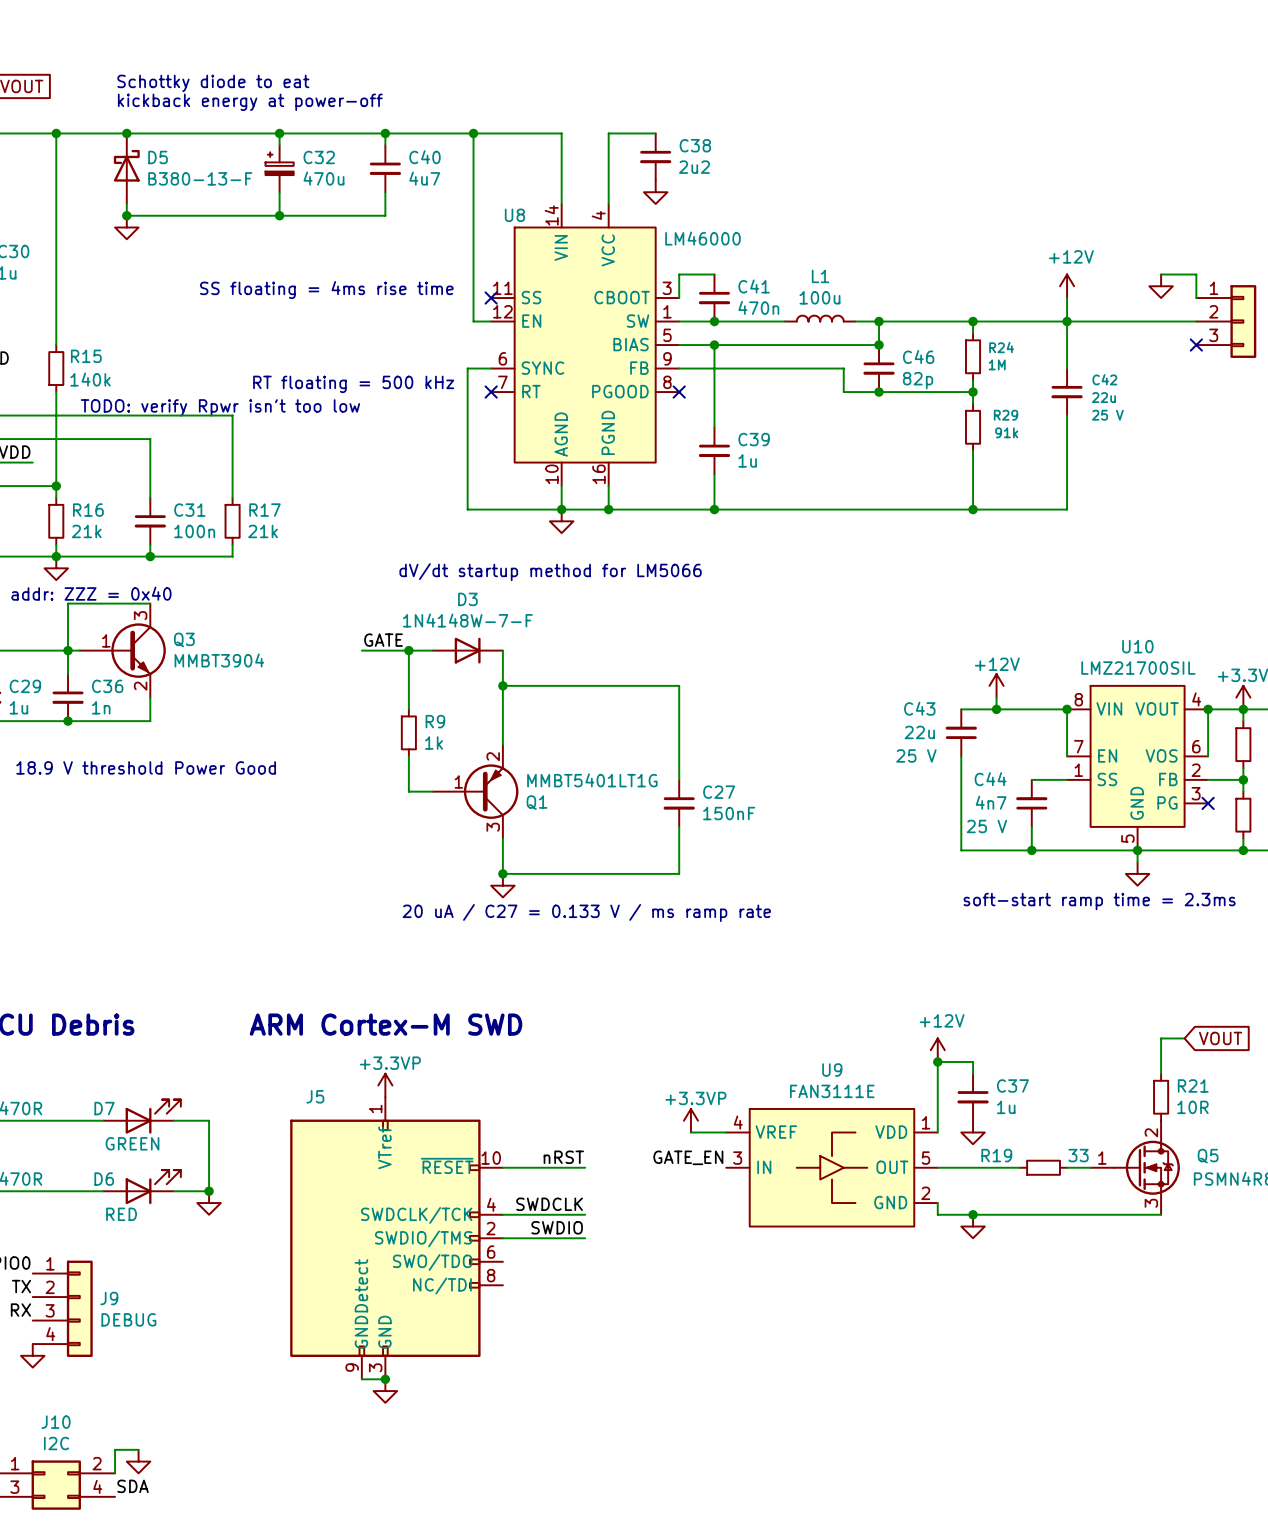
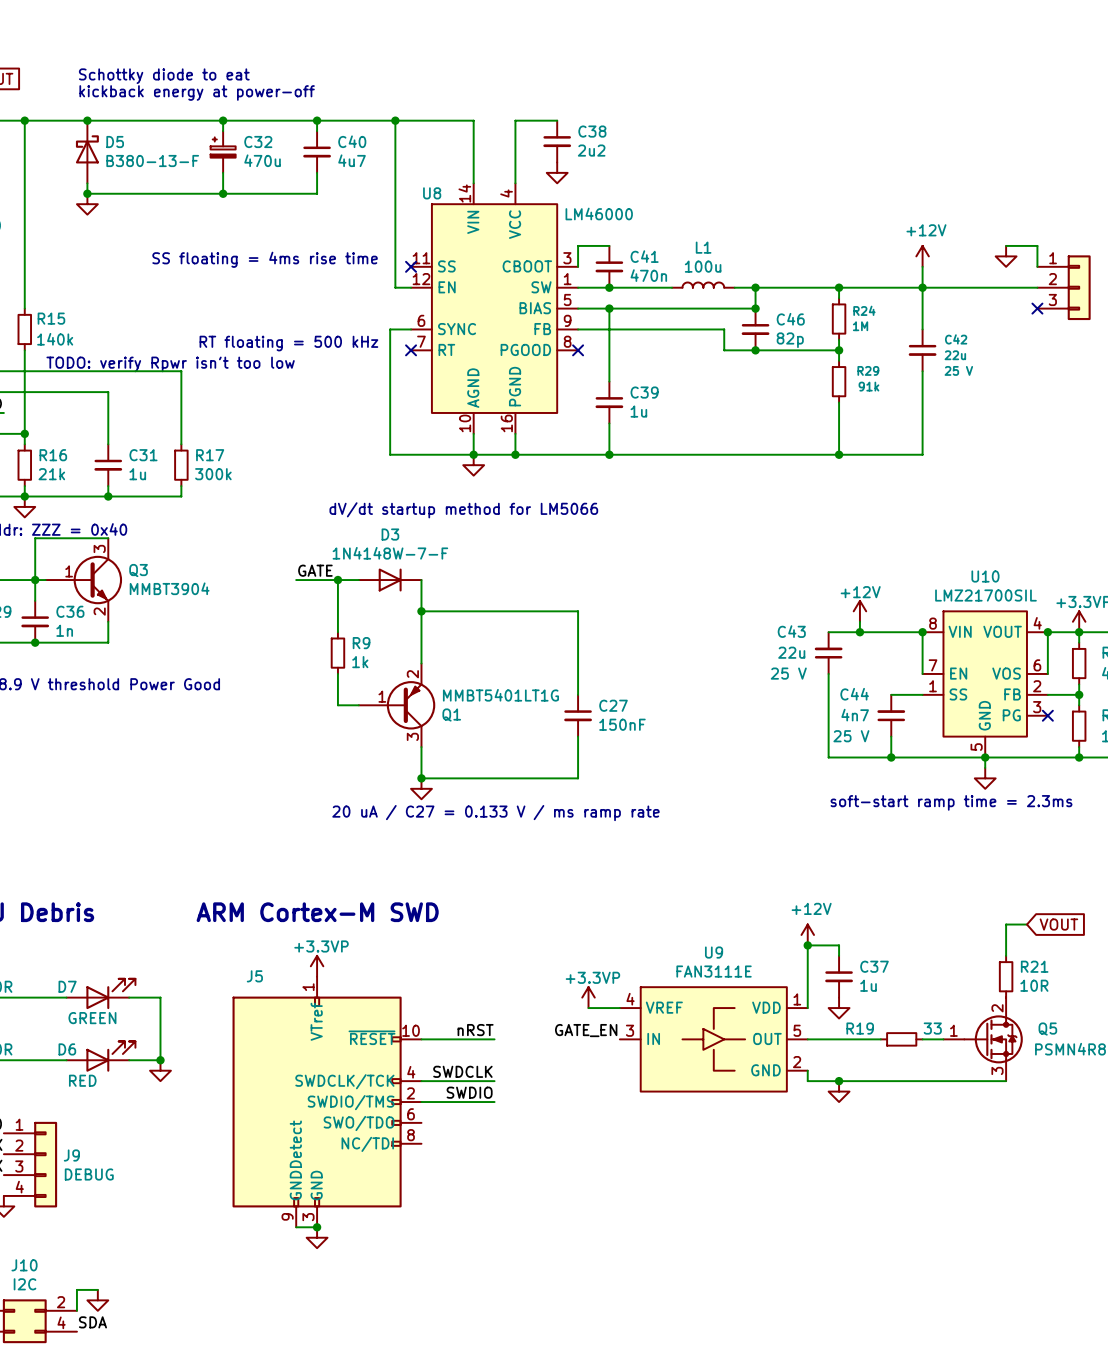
C31 value: 100n (194, 531) -> 1u (137, 474)
R17 value: 21k (263, 531) -> 300k (213, 474)

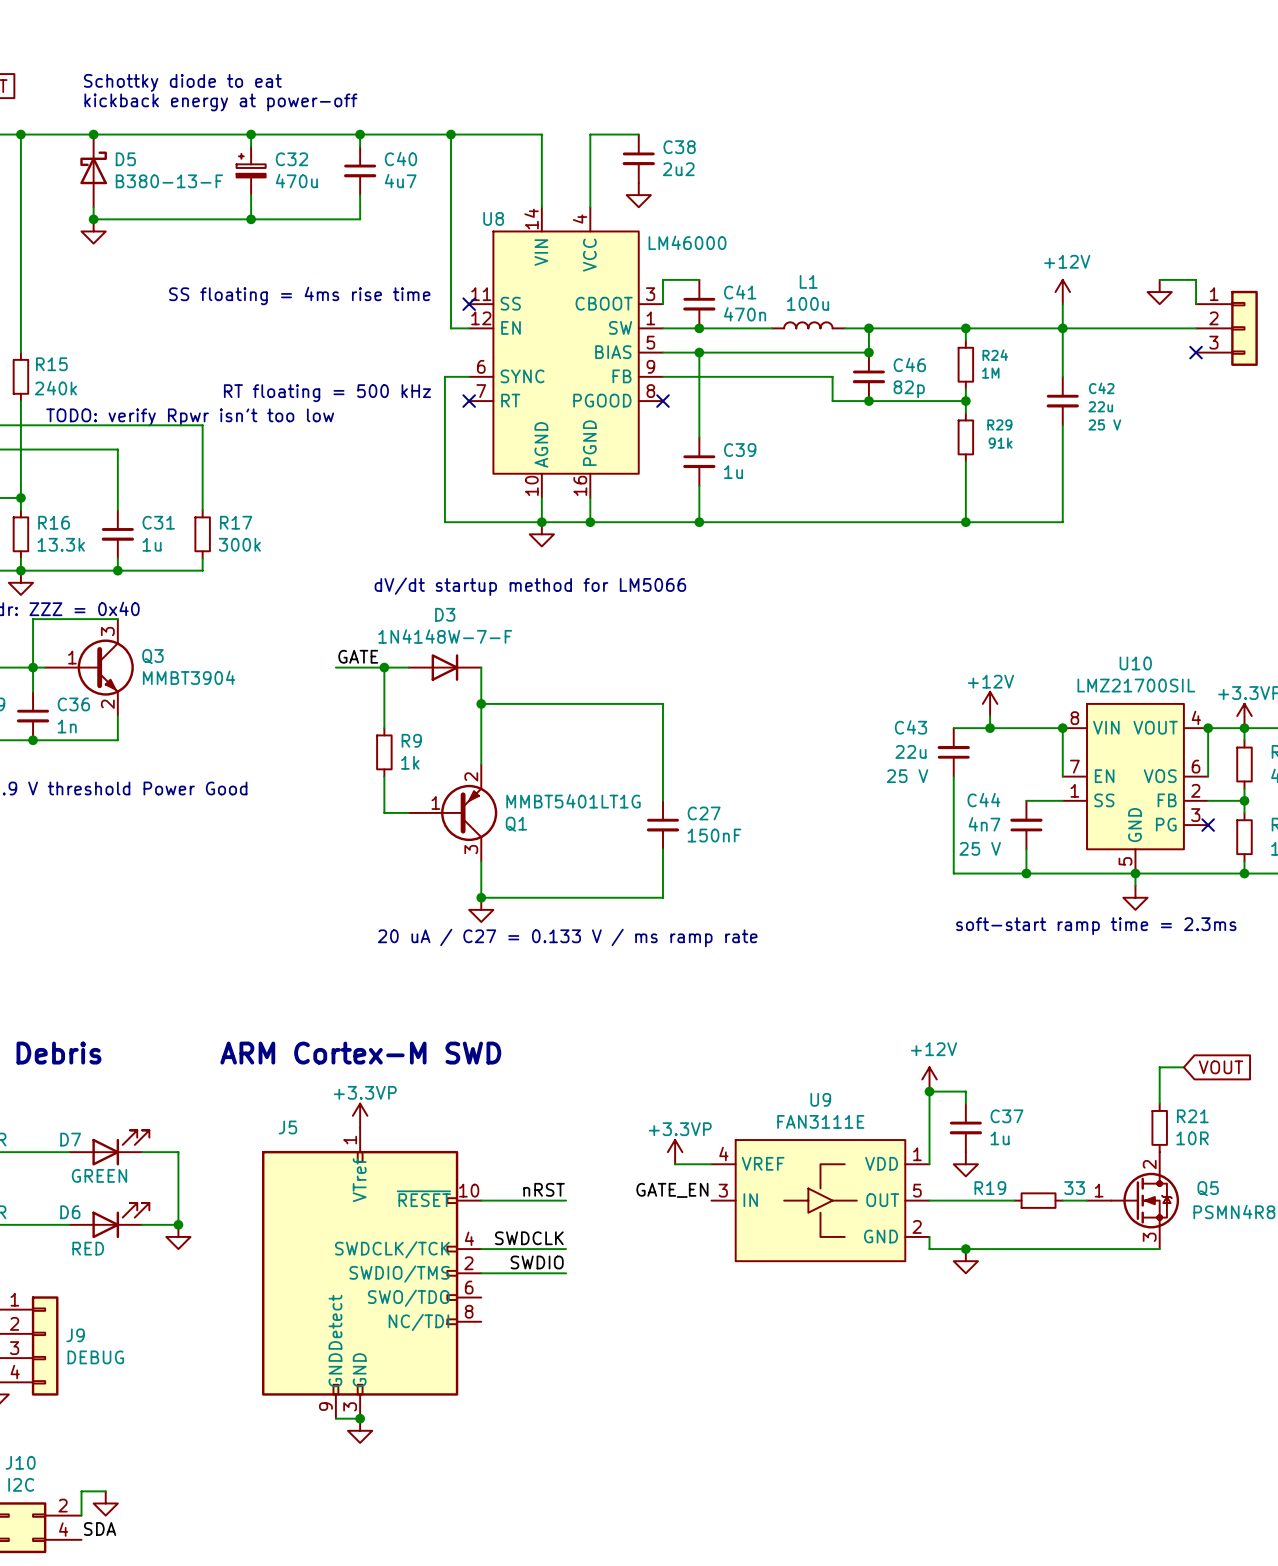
R15 value: 140k (55, 339) -> 240k (55, 388)
R16 value: 21k (51, 474) -> 13.3k (61, 544)

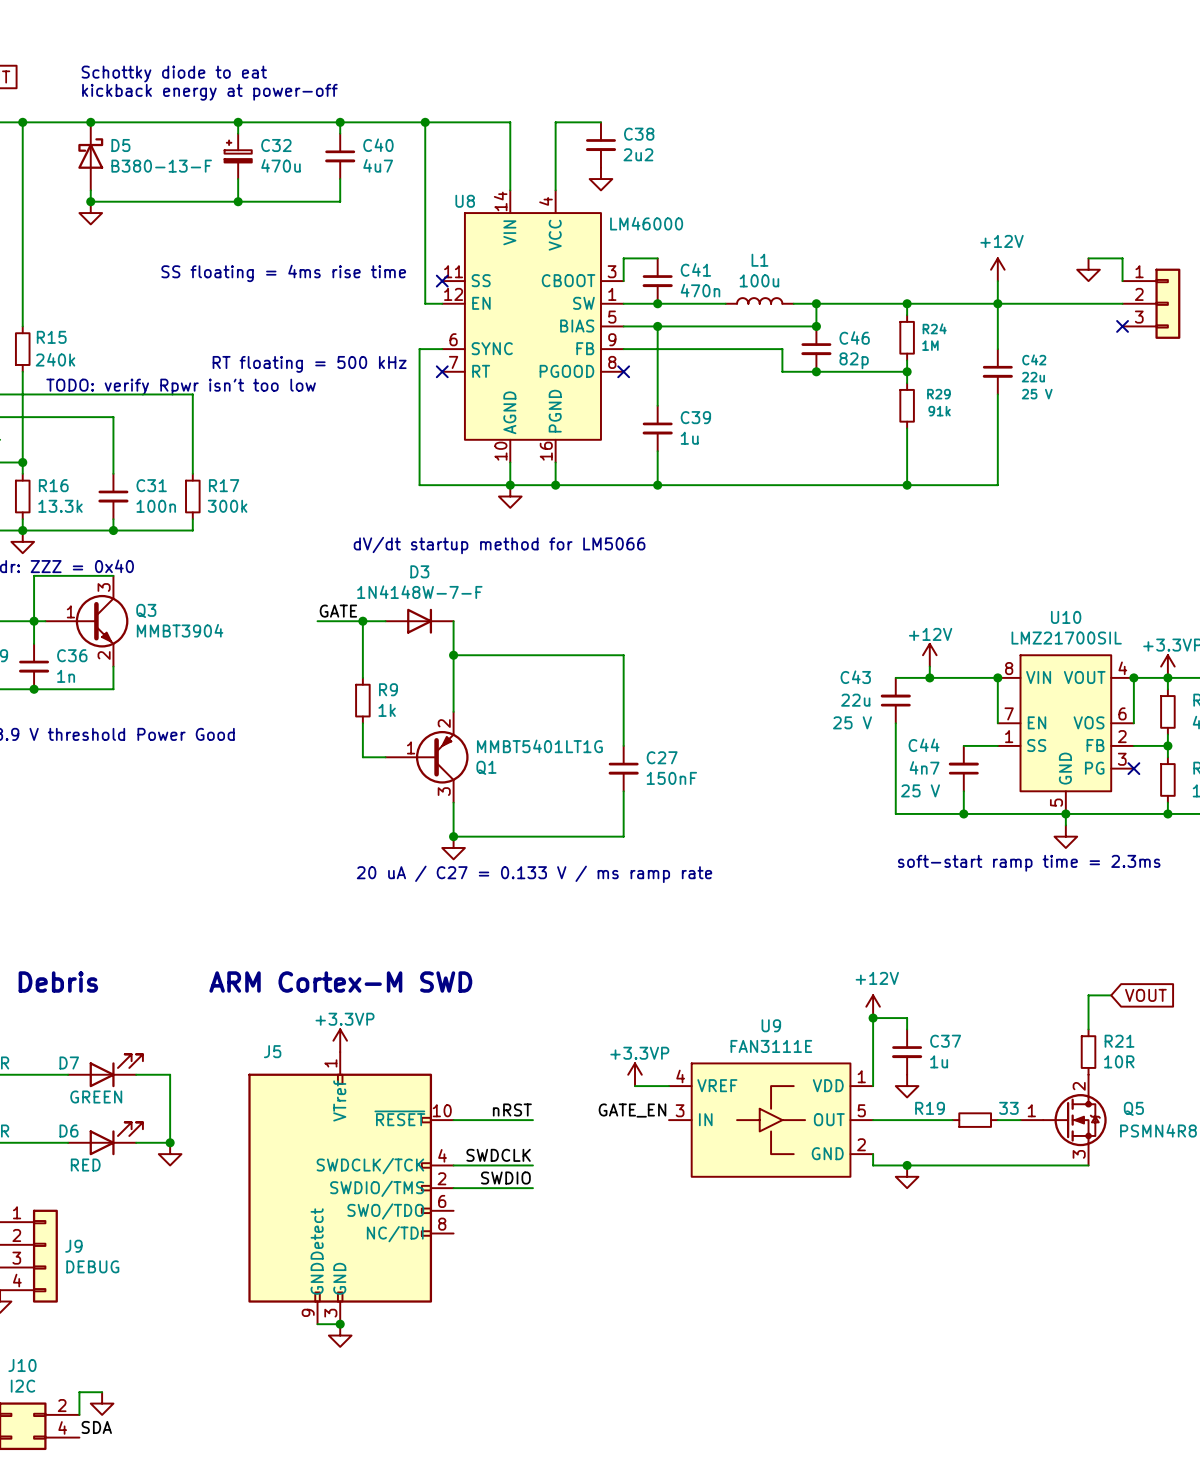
C31 value: 1u (152, 544) -> 100n (156, 506)

